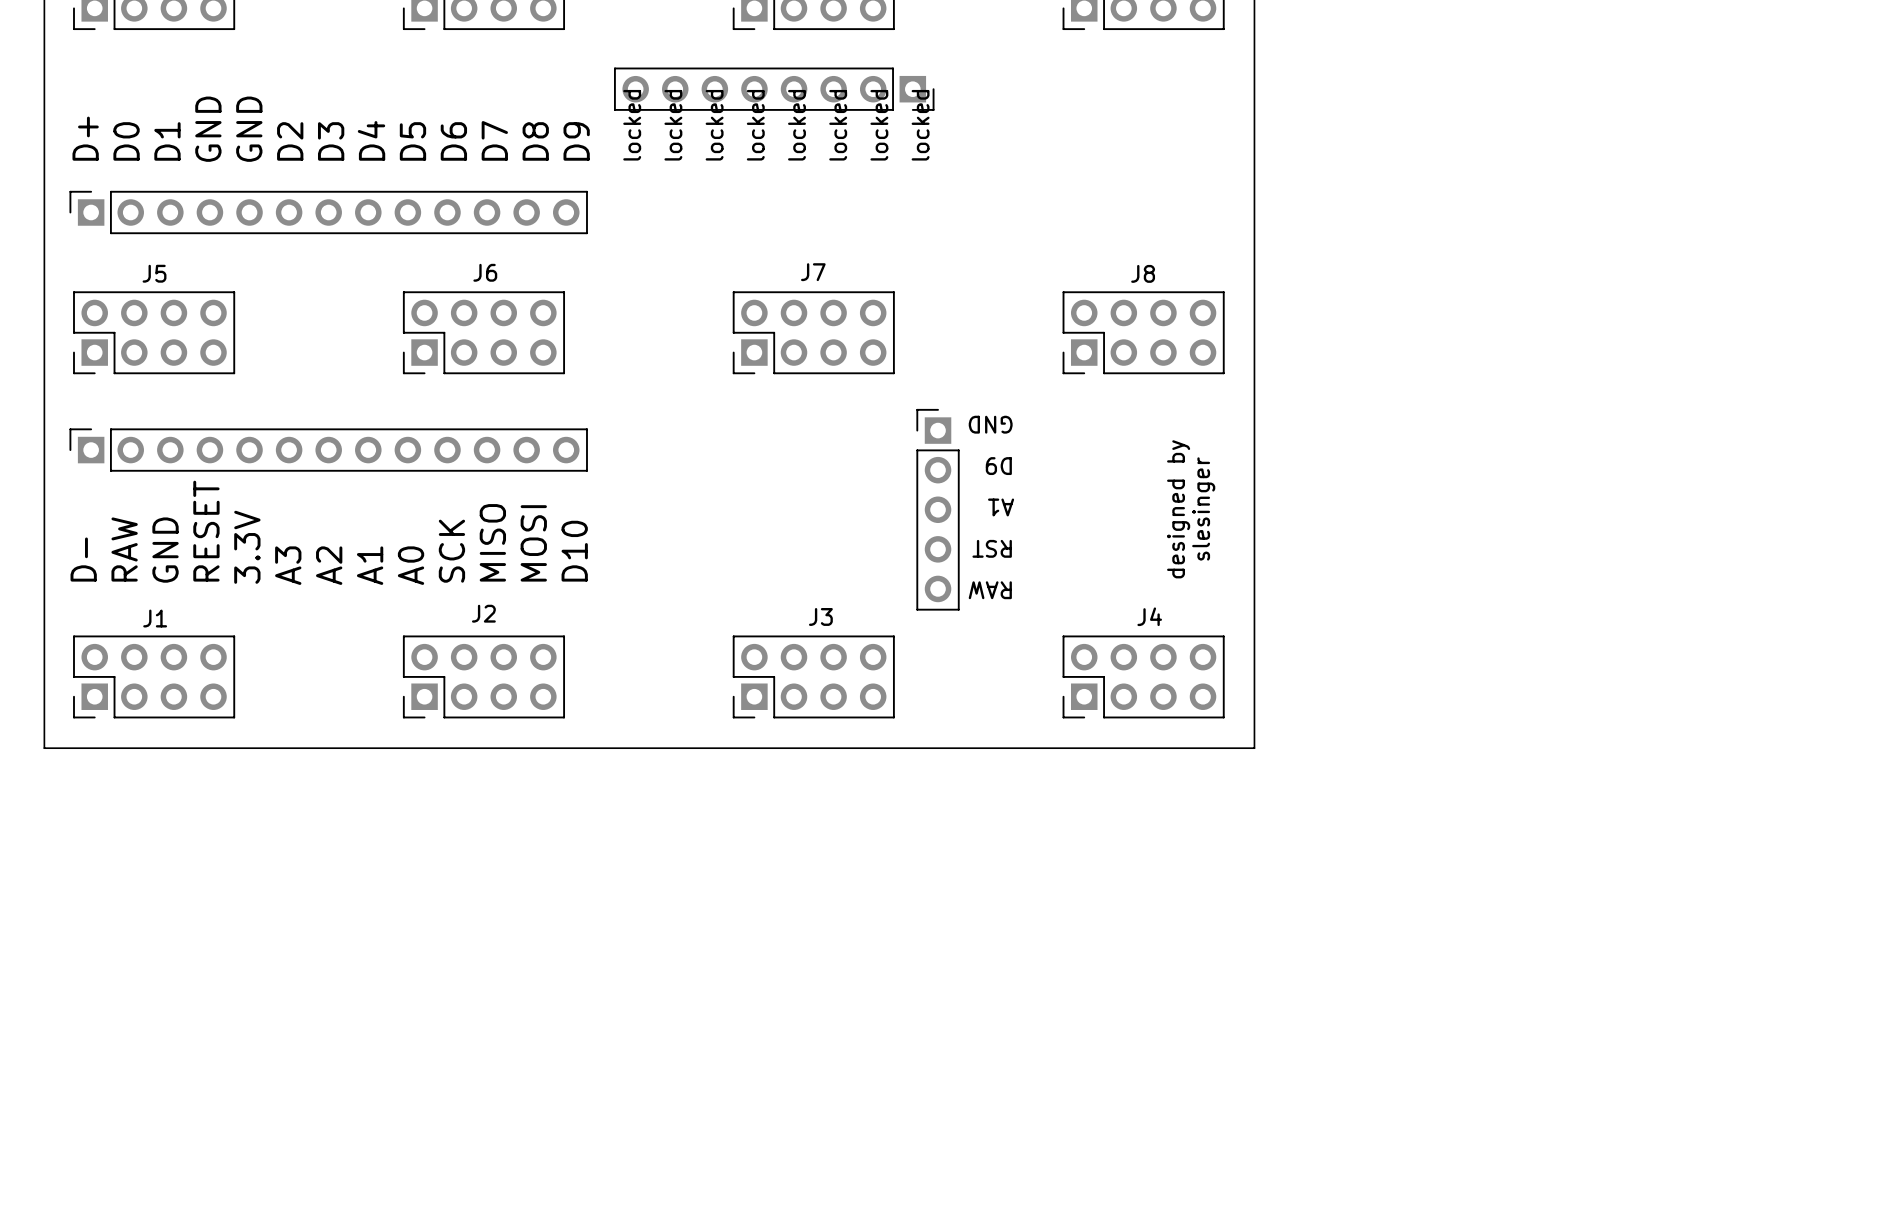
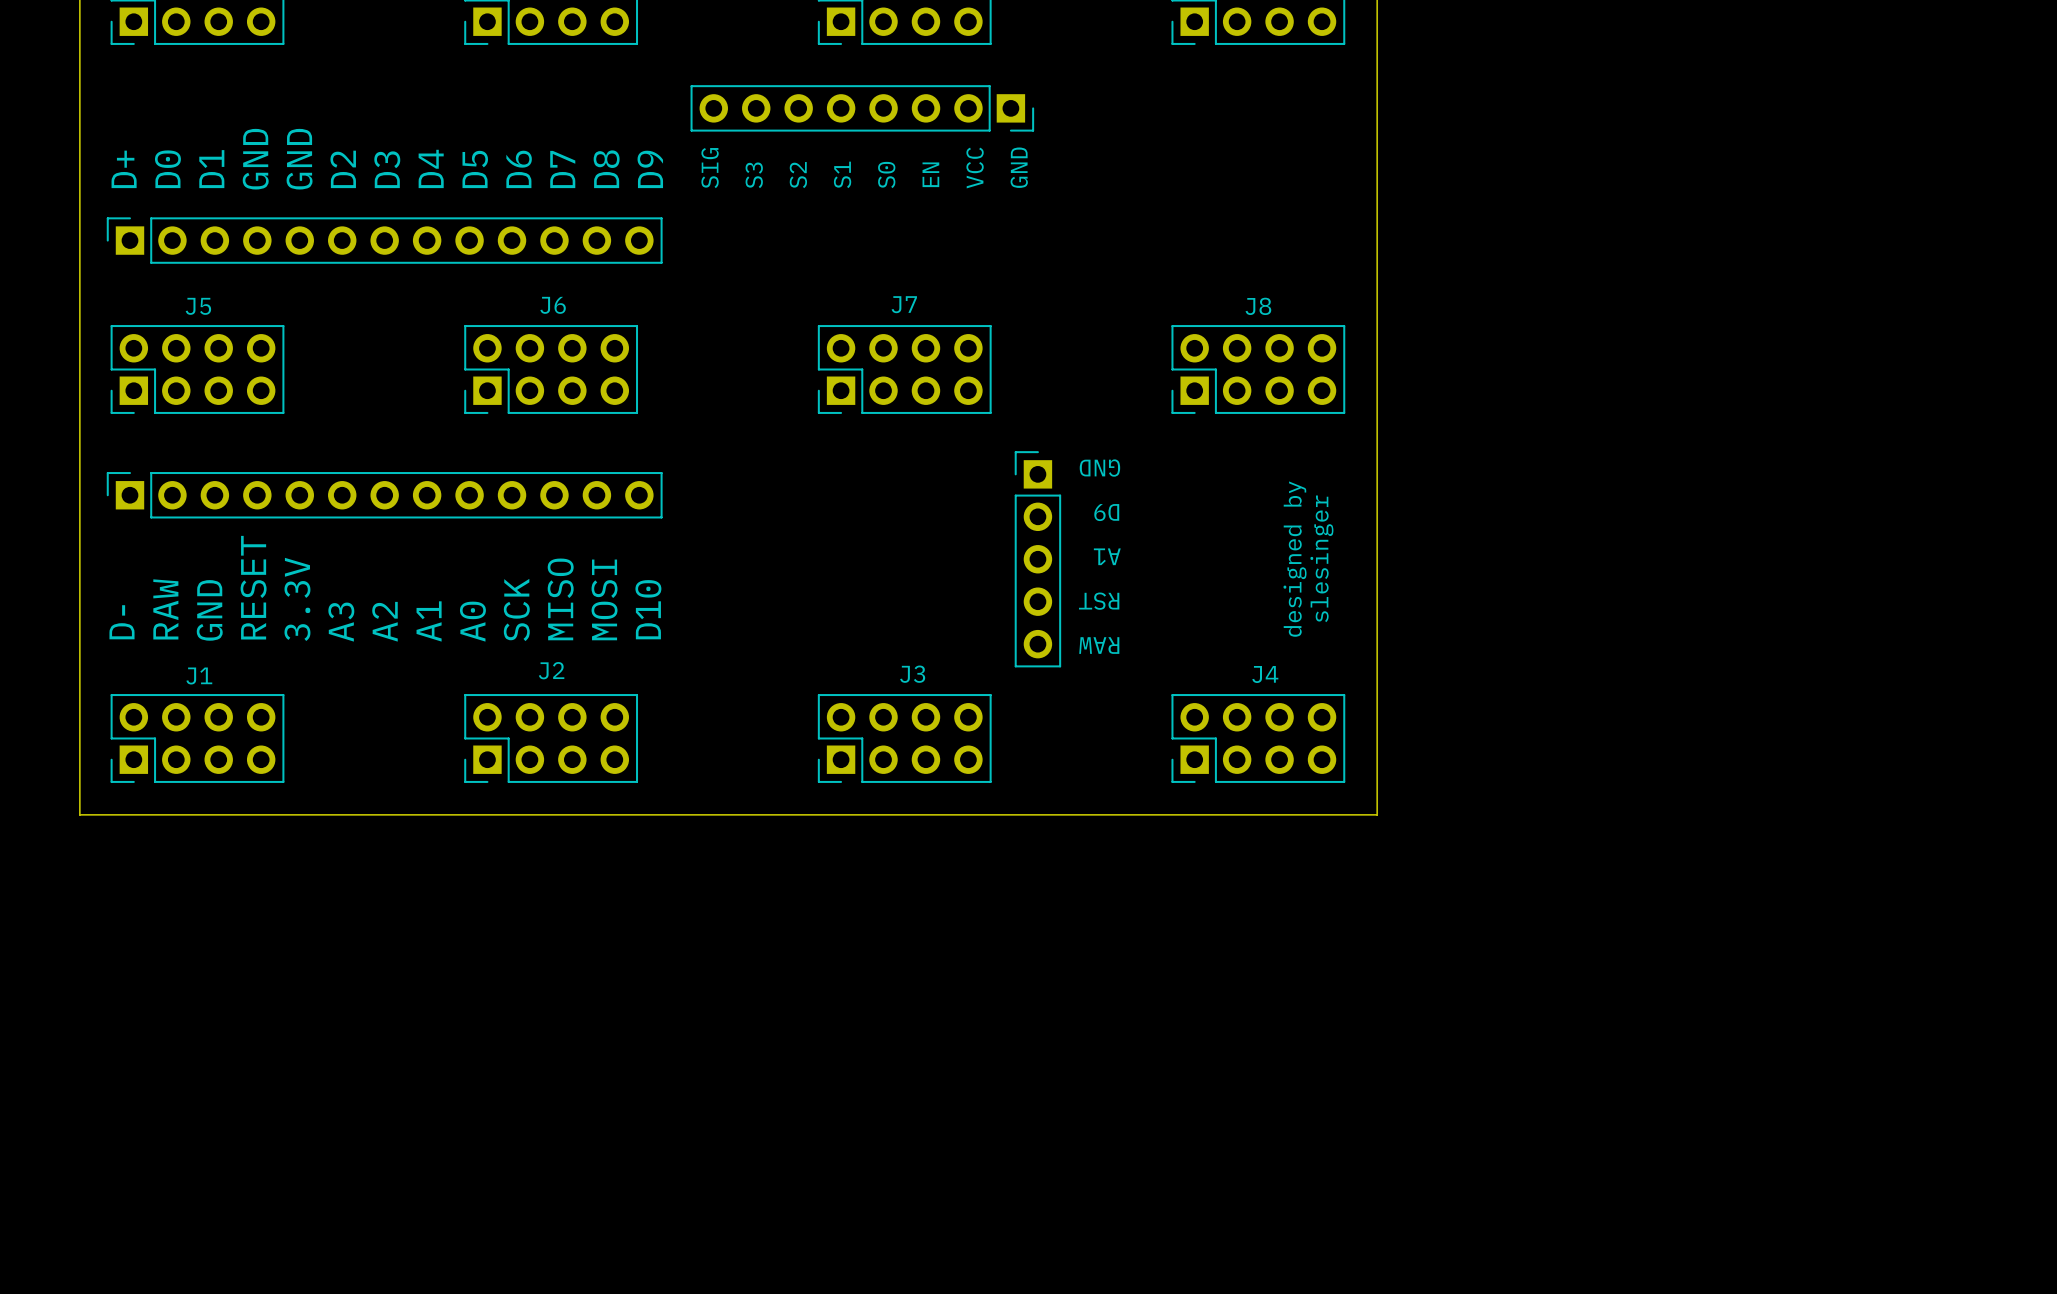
text: locked (632, 125) -> SIG (710, 168)
text: locked (673, 125) -> S3 (754, 175)
text: locked (714, 125) -> S2 (798, 175)
text: locked (755, 125) -> S1 (842, 174)
text: locked (796, 125) -> S0 (886, 175)
text: locked (838, 125) -> EN (930, 174)
text: locked (879, 125) -> VCC (975, 168)
text: locked (920, 125) -> GND (1019, 167)

